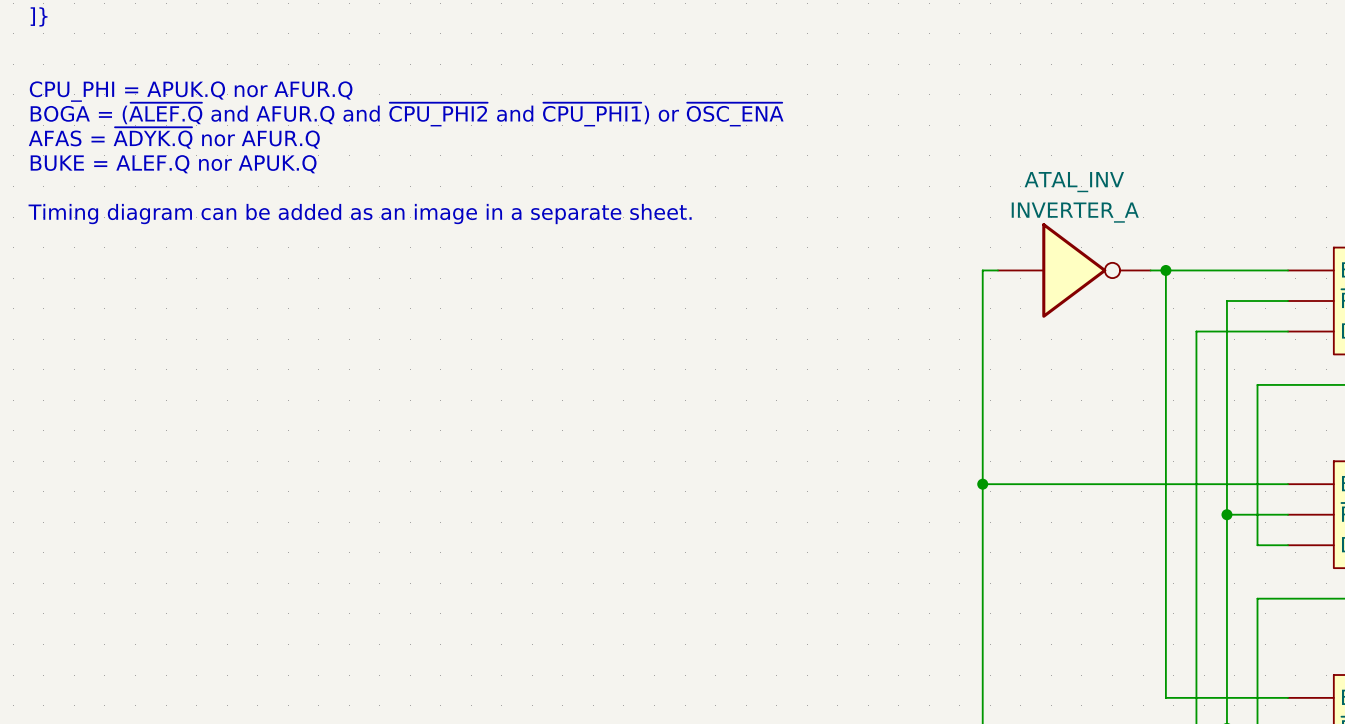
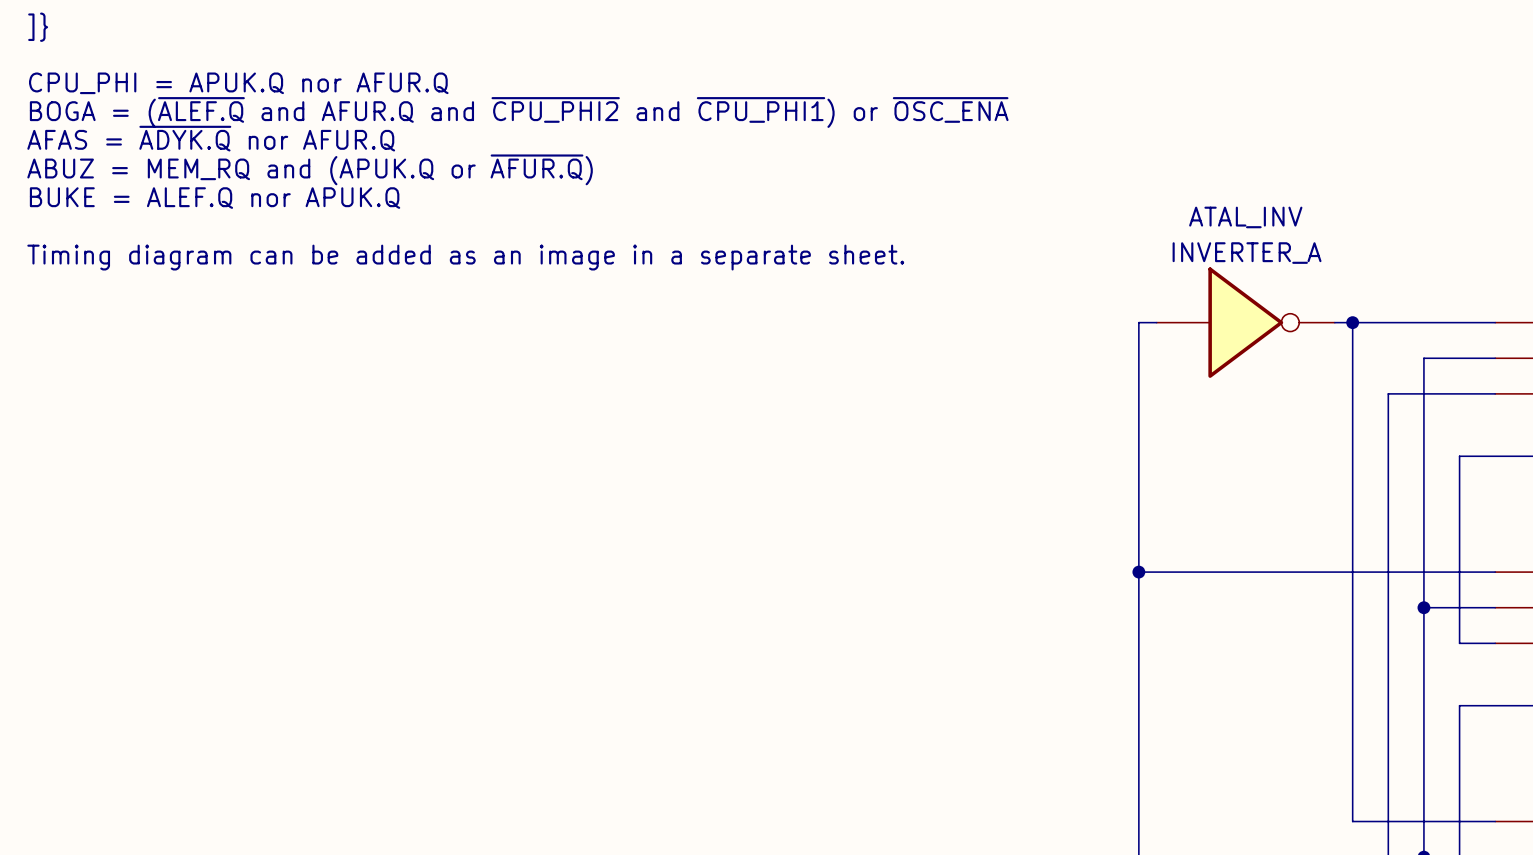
text: none -> CPU_PHI = APUK.Q nor AFUR.Q (238, 83)
text: CPU_PHI = APUK.Q nor AFUR.Q (191, 91) -> BOGA = (~{ALEF.Q} and AFUR.Q and ~{CPU_PHI2} and ~{CPU_PHI1}) or ~{OSC_ENA} (519, 112)
text: BOGA = (~{ALEF.Q} and AFUR.Q and ~{CPU_PHI2} and ~{CPU_PHI1}) or ~{OSC_ENA} (407, 114) -> AFAS = ~{ADYK.Q} nor AFUR.Q (211, 138)
text: AFAS = ~{ADYK.Q} nor AFUR.Q (174, 138) -> ABUZ = MEM_RQ and (APUK.Q or ~{AFUR.Q}) (310, 169)

